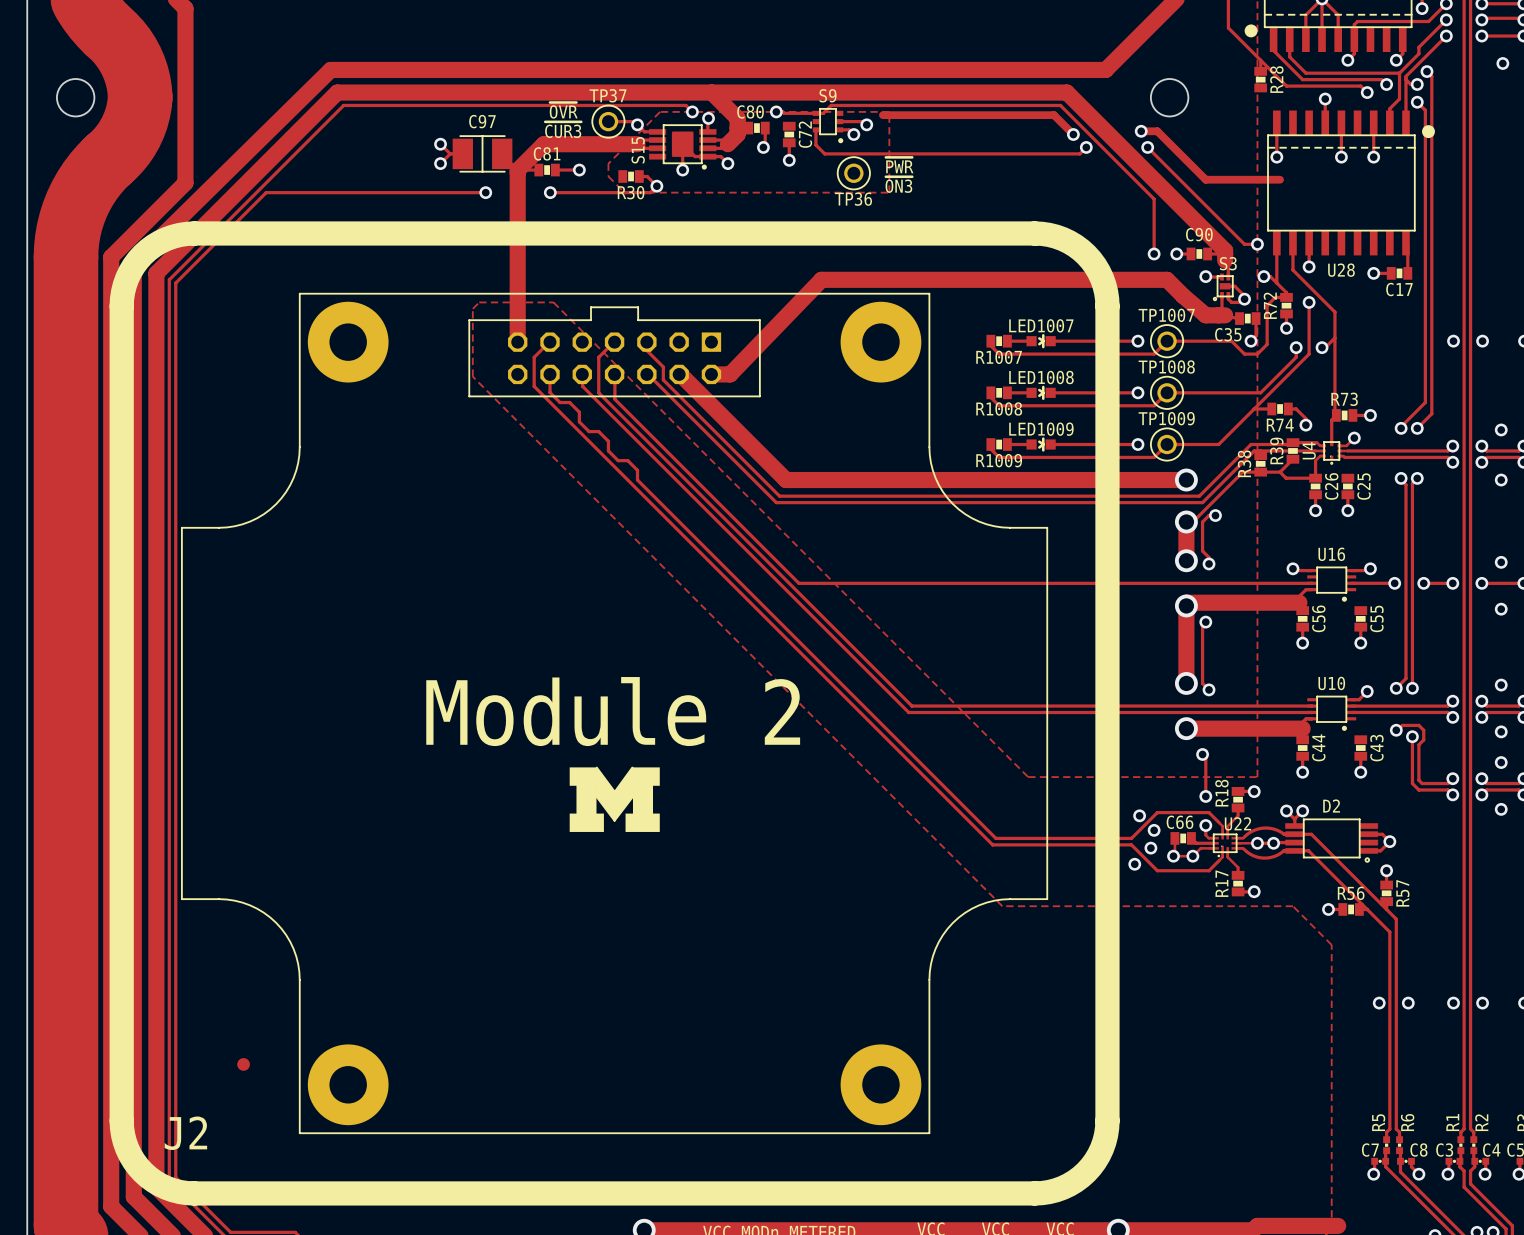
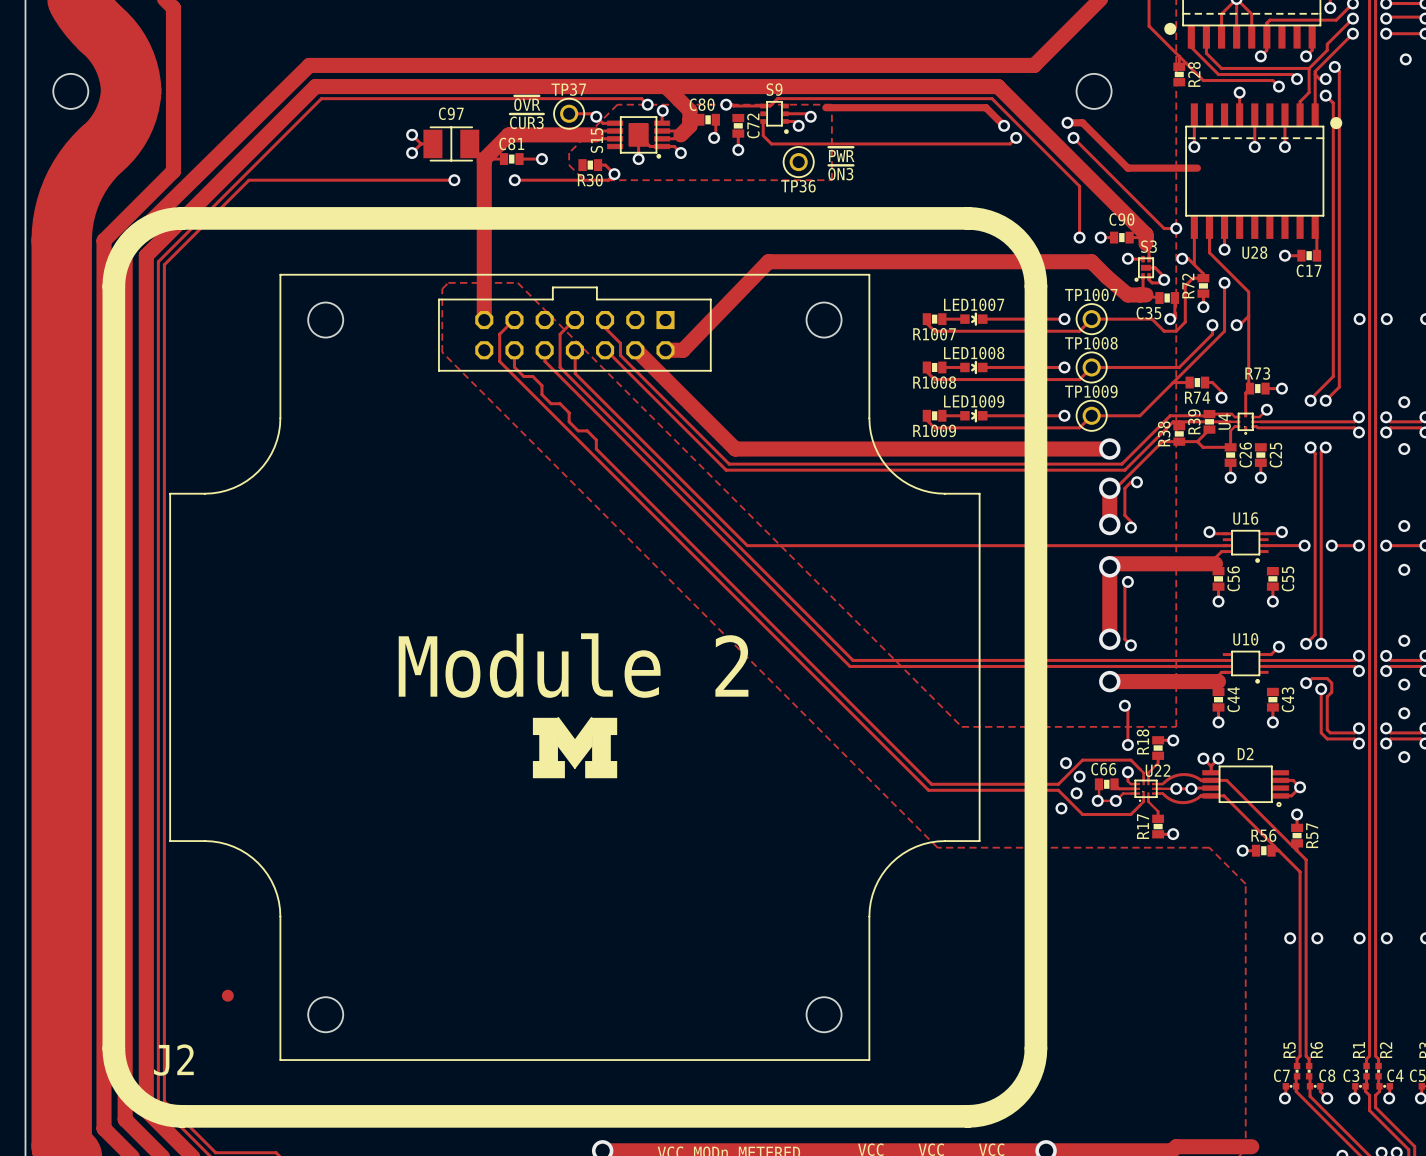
J2 footprint: [109, 221, 1120, 1206] -> [102, 207, 1048, 1128]

